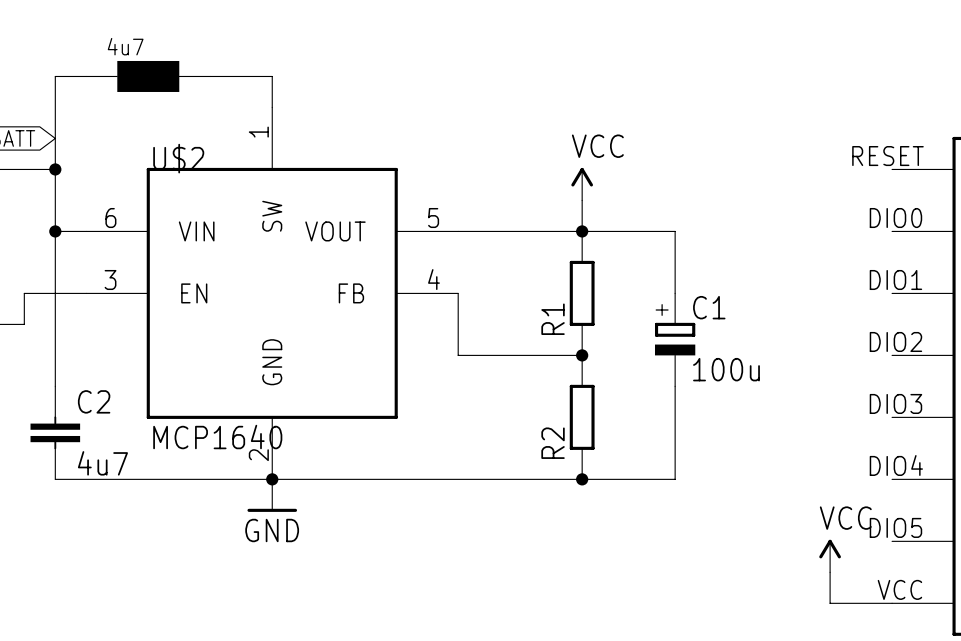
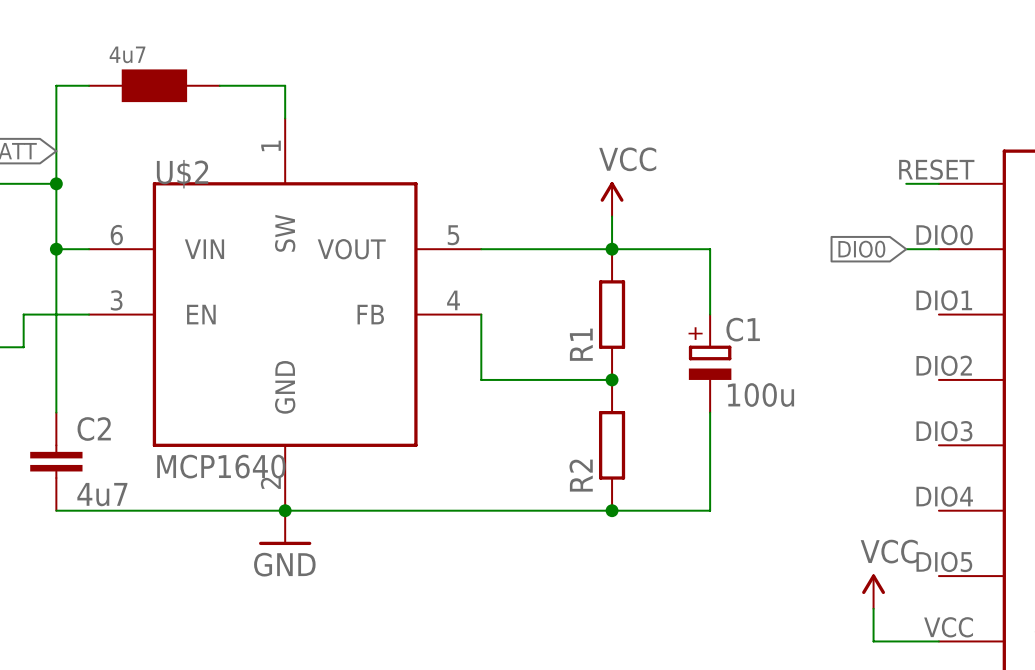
wire: none -> (906, 183) (938, 183)
global label: none -> DIO0 (861, 249)
wire: none -> (906, 249) (938, 249)

